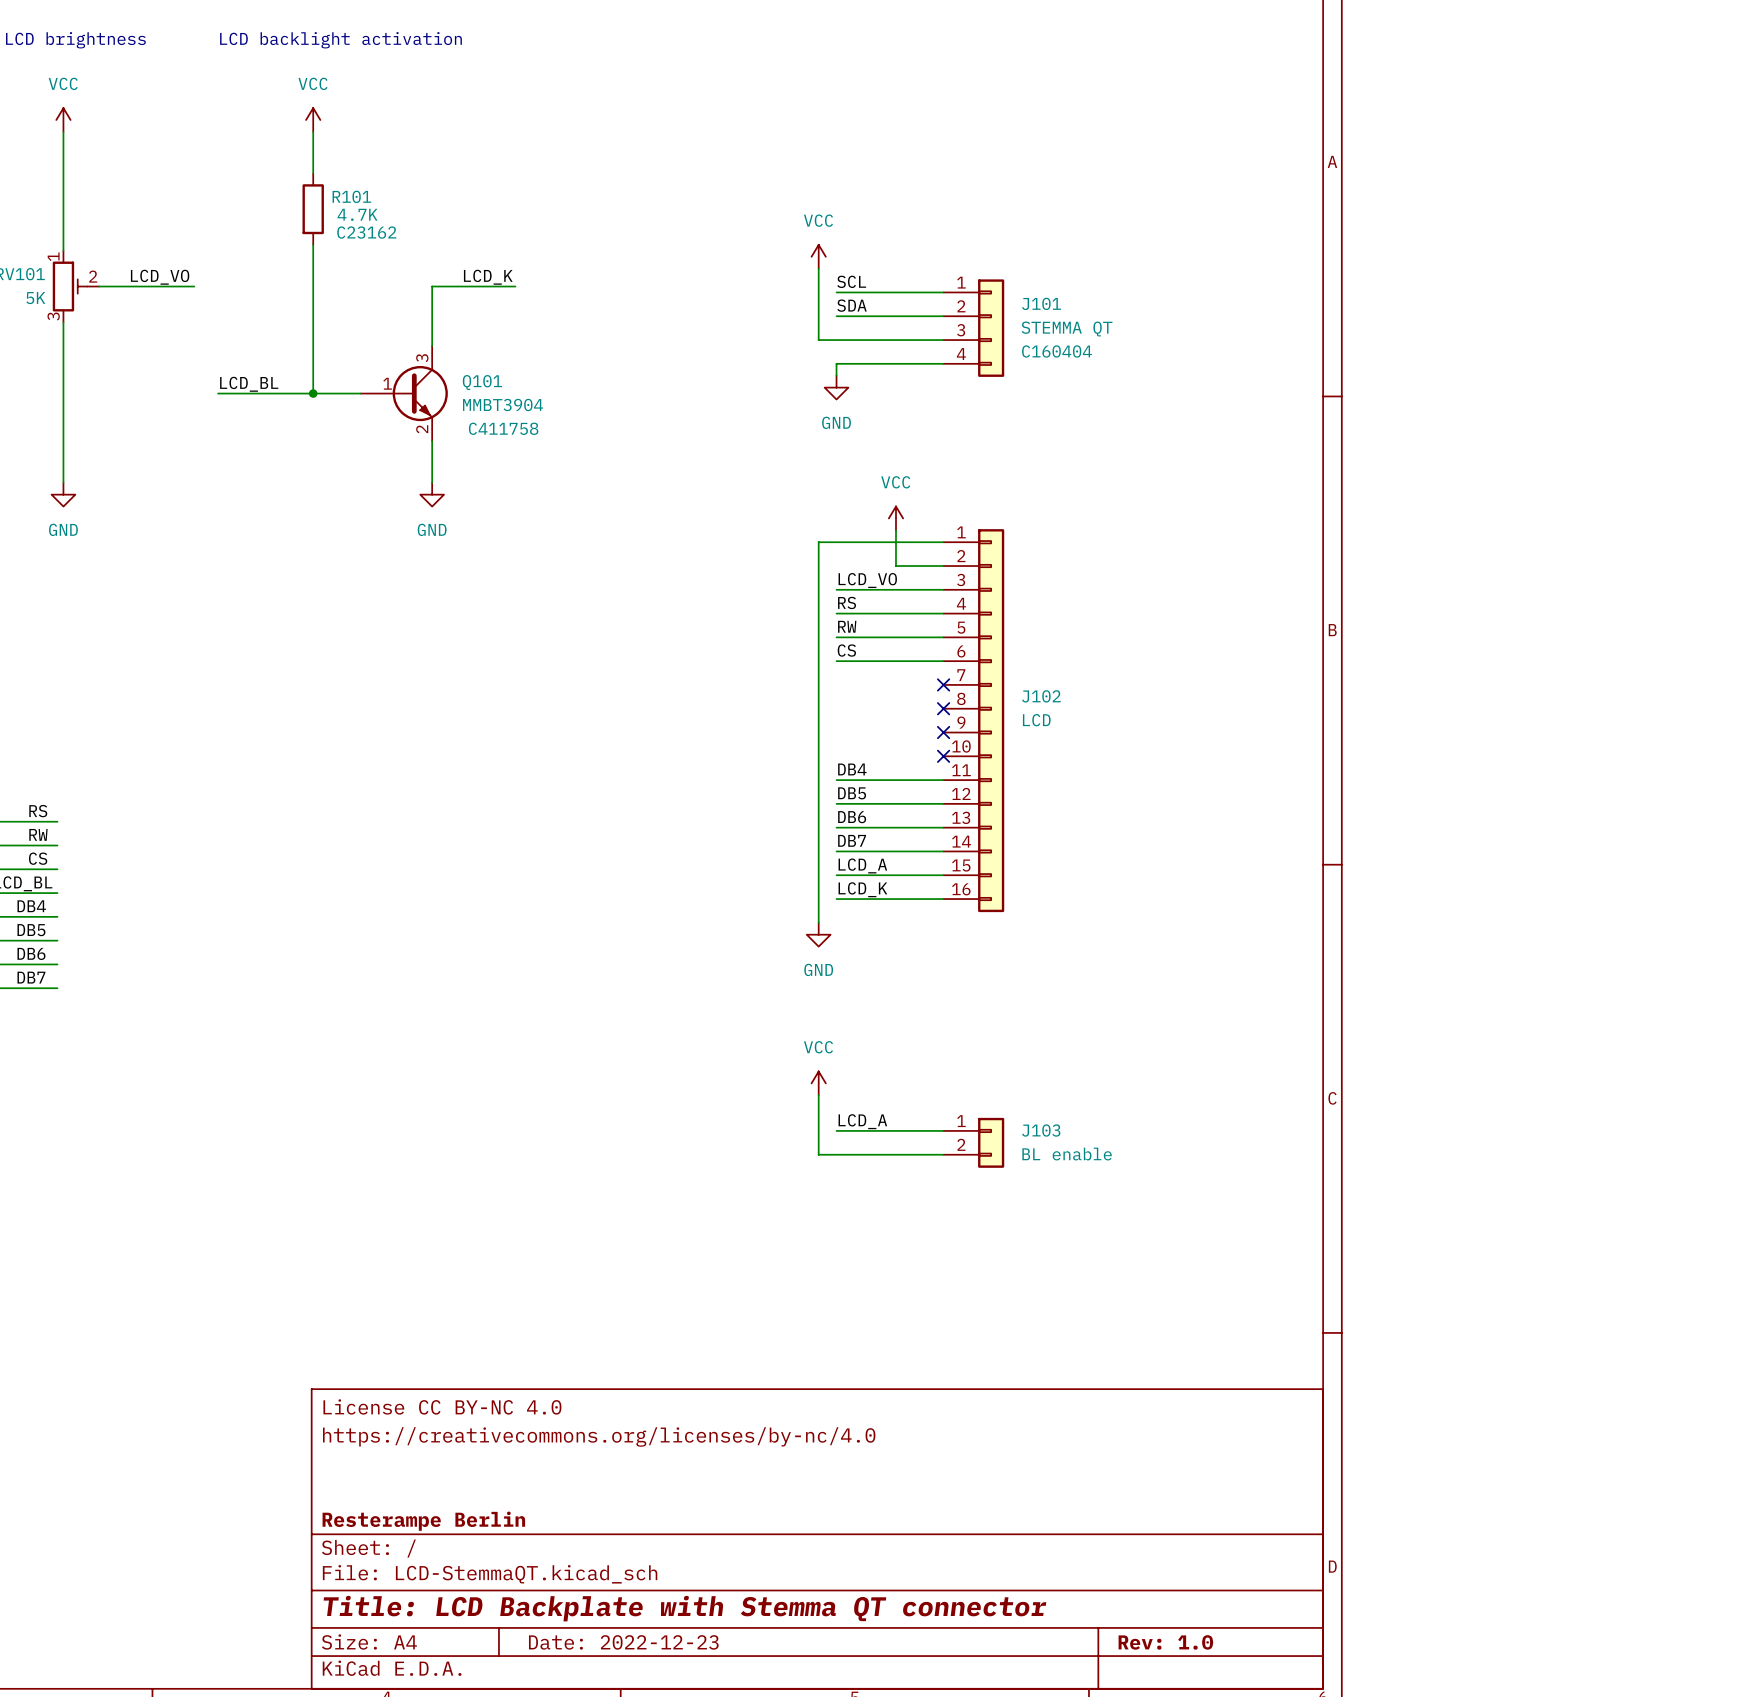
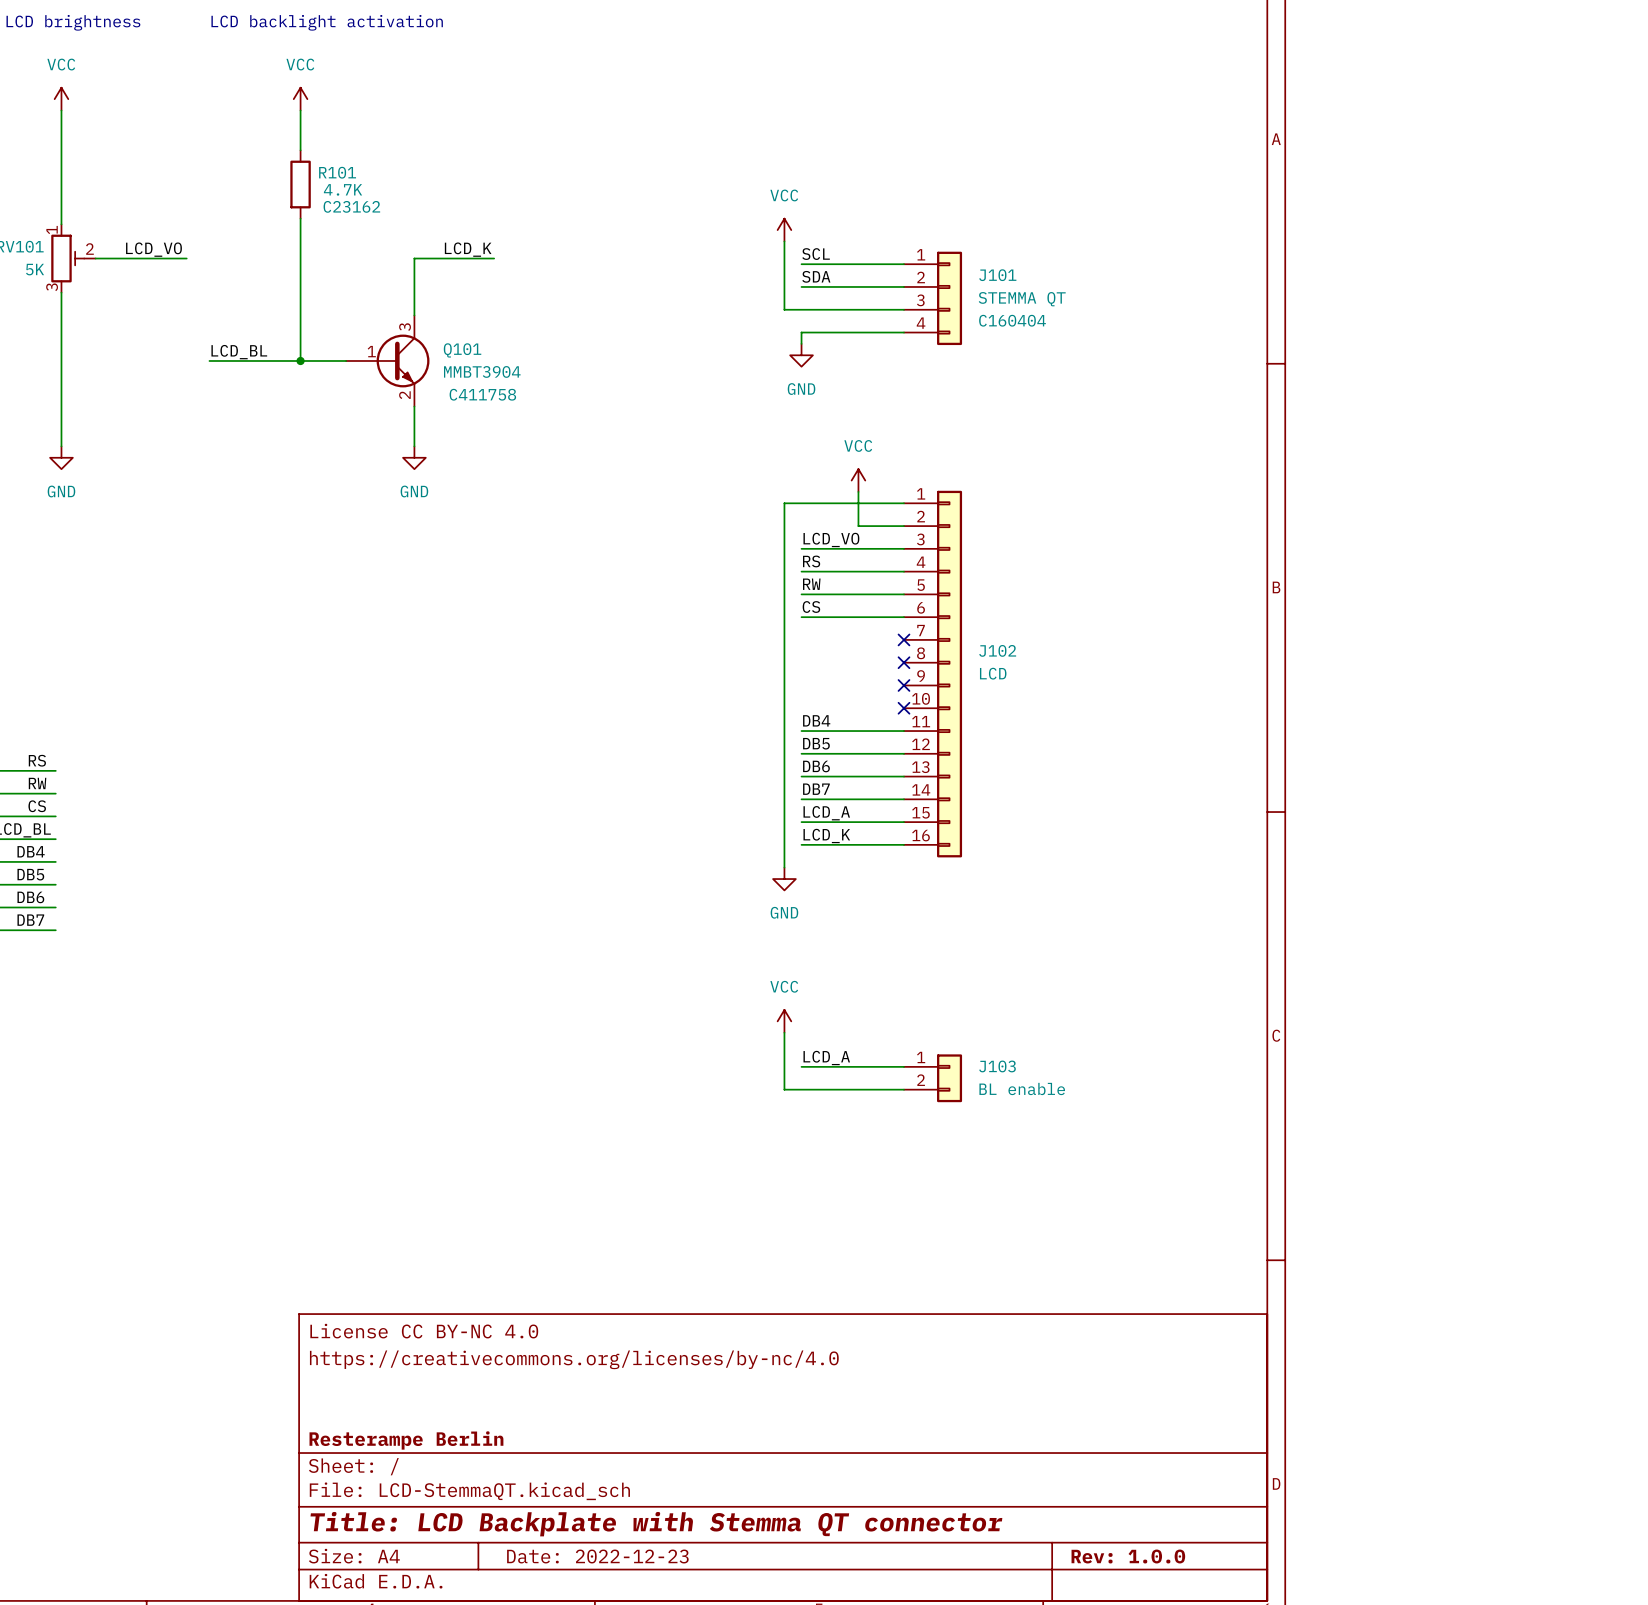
title block: Rev: 1.0 (1165, 1642) -> Rev: 1.0.0 (1128, 1556)

